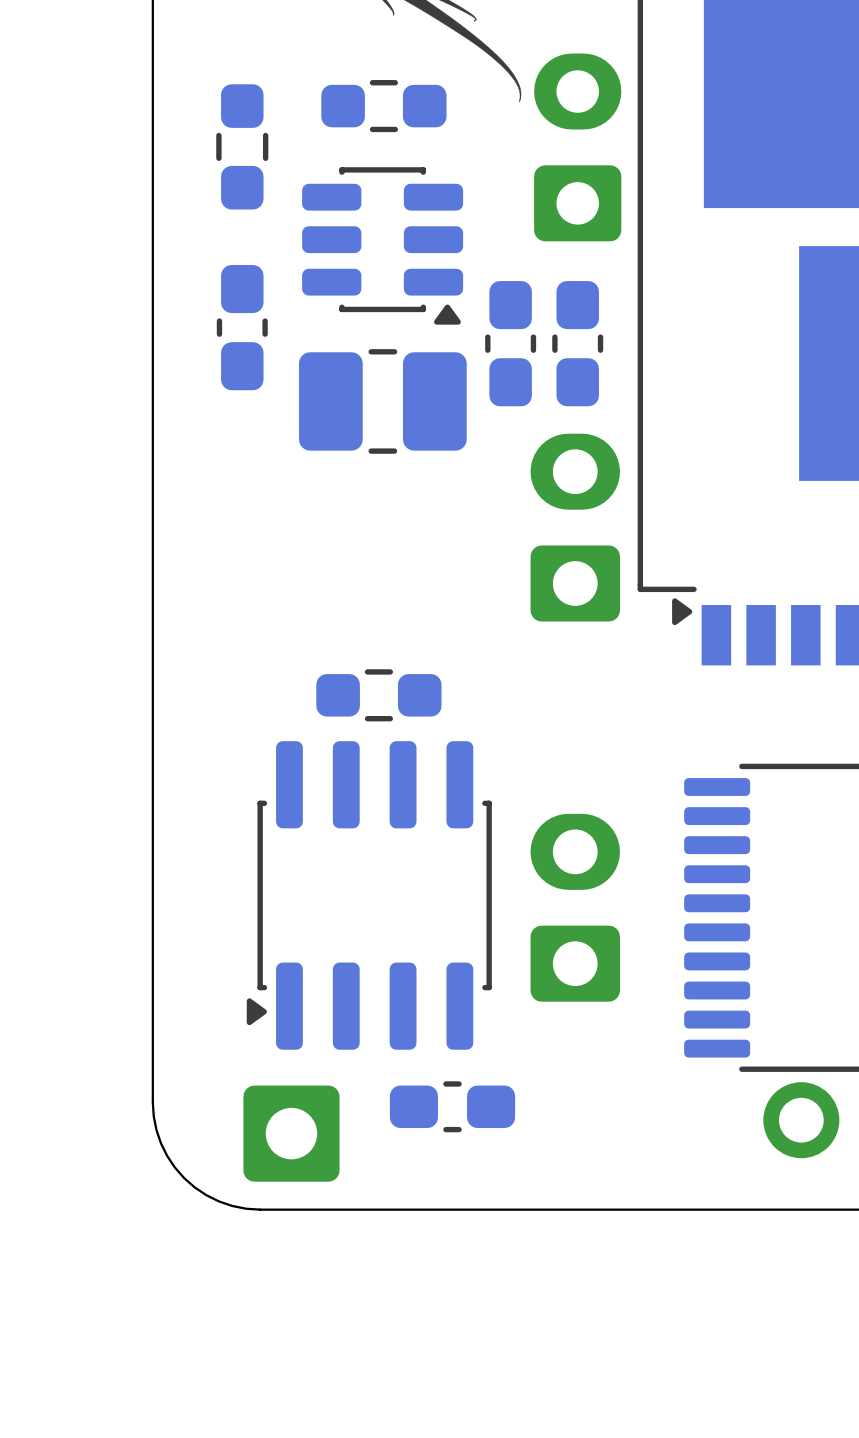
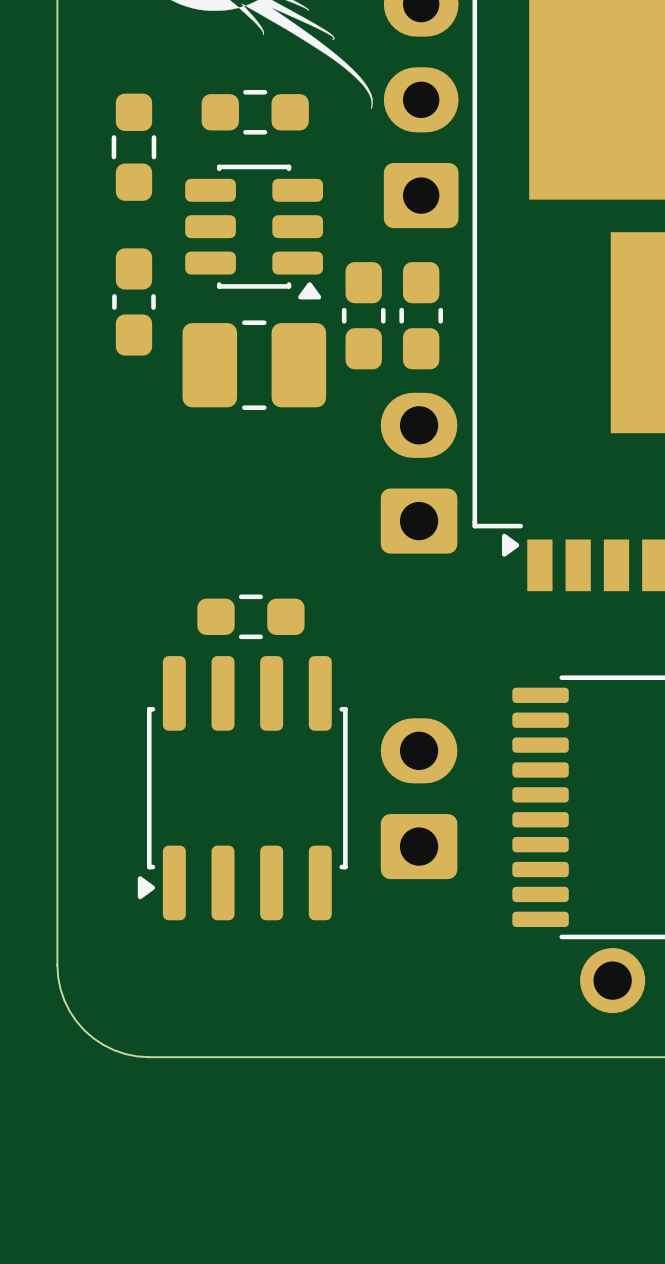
part: (452, 1106) -> none
part: (291, 1133) -> none

